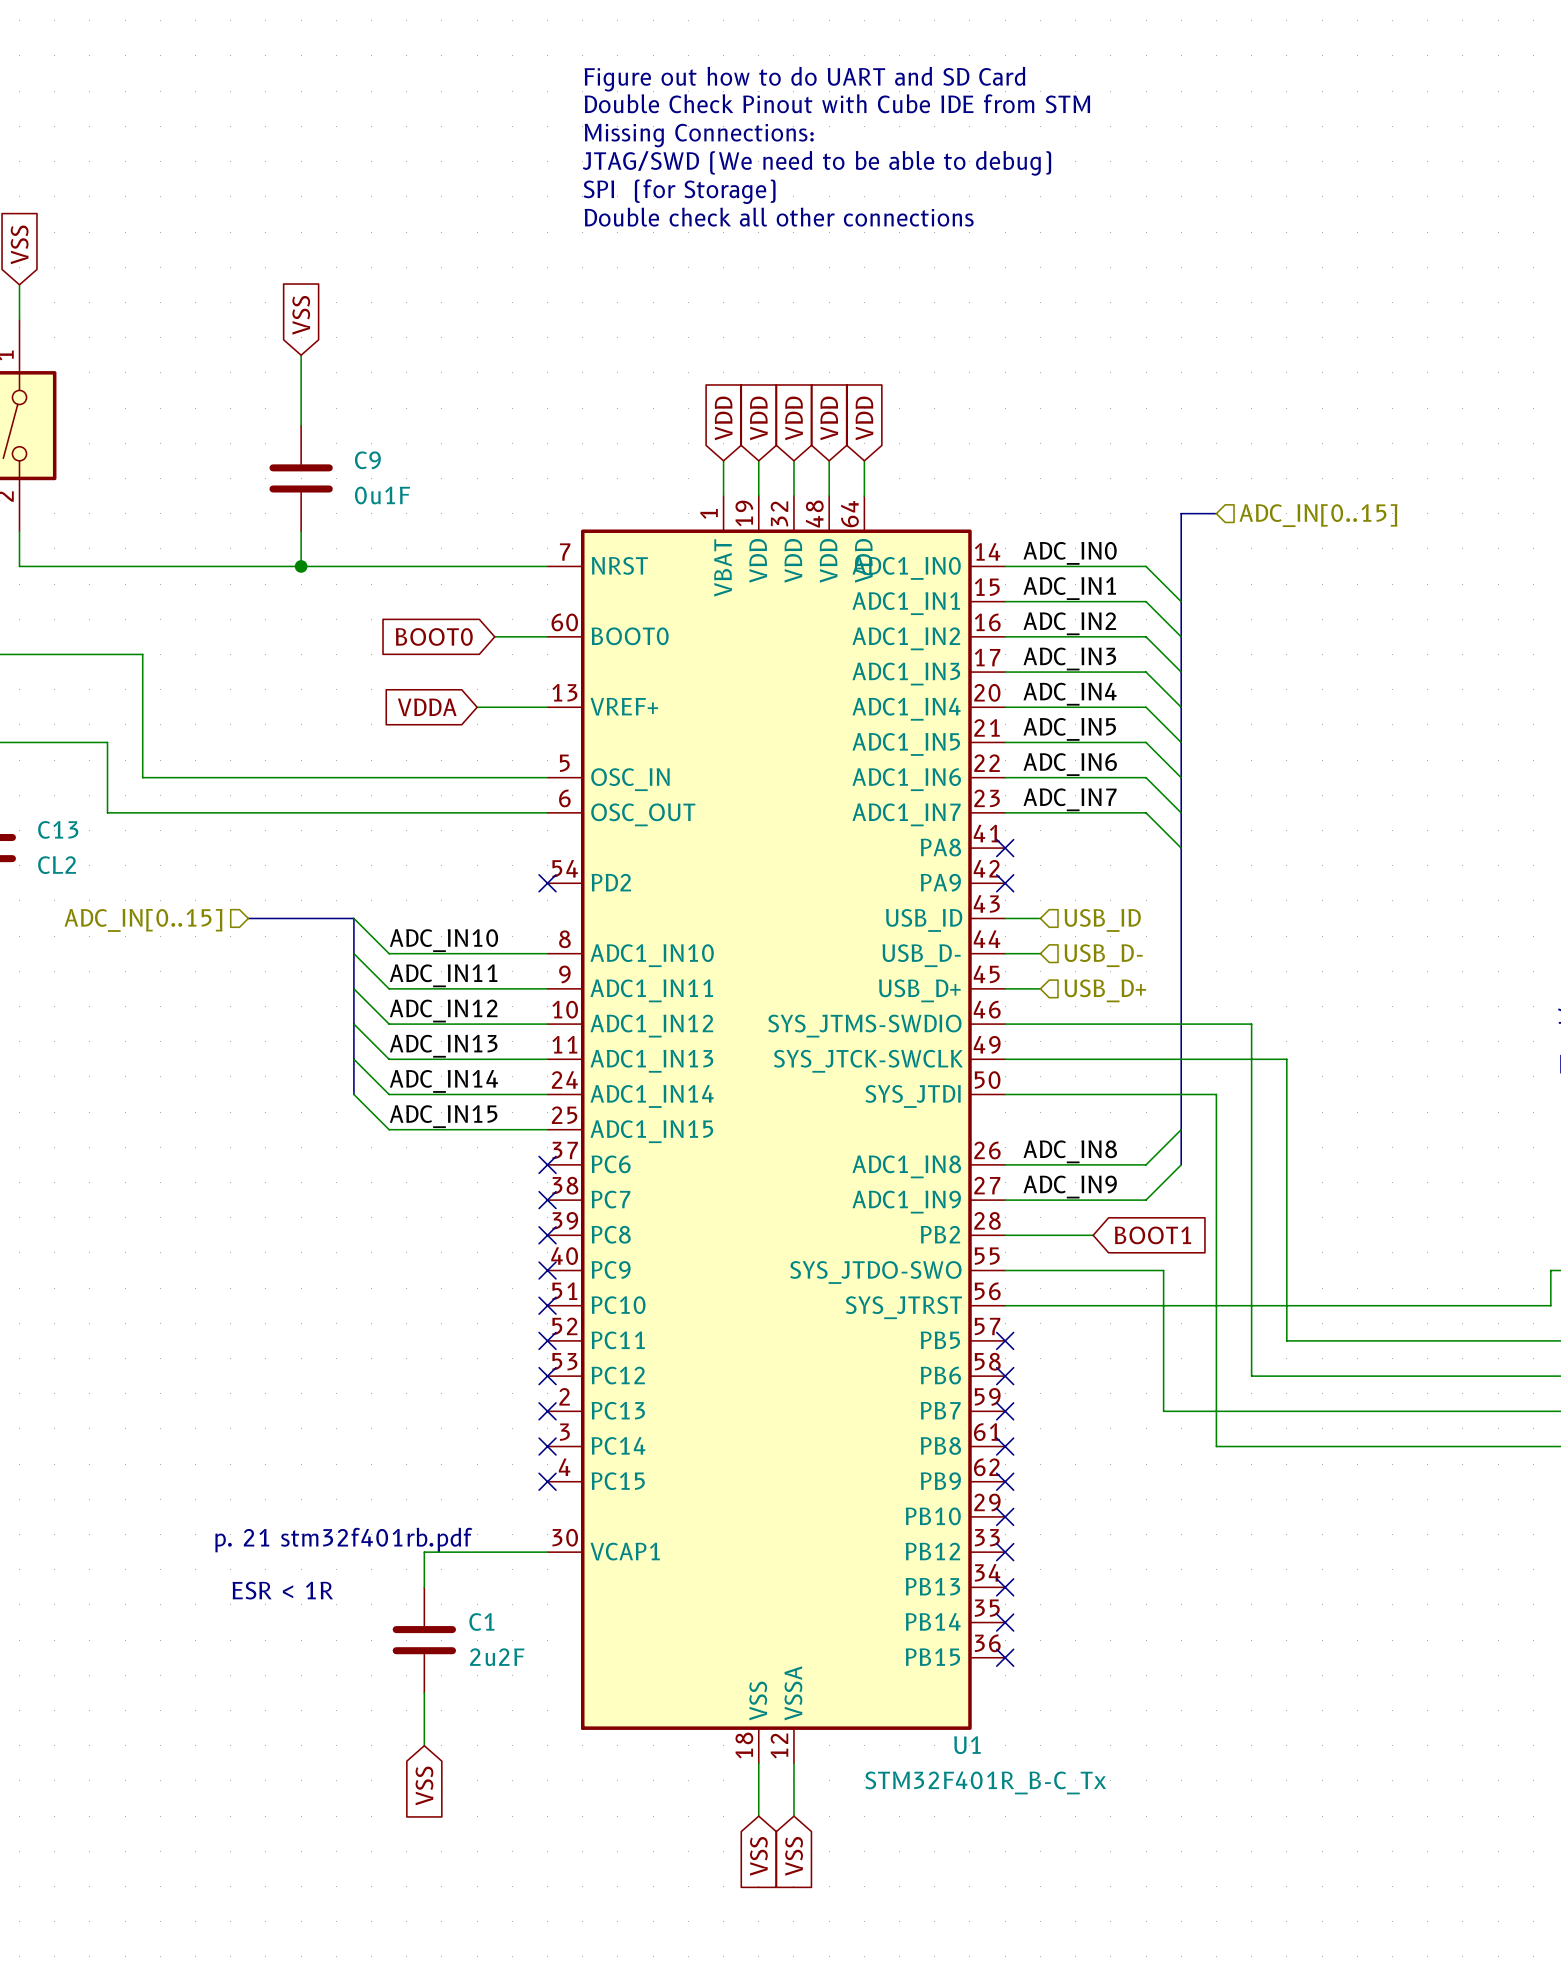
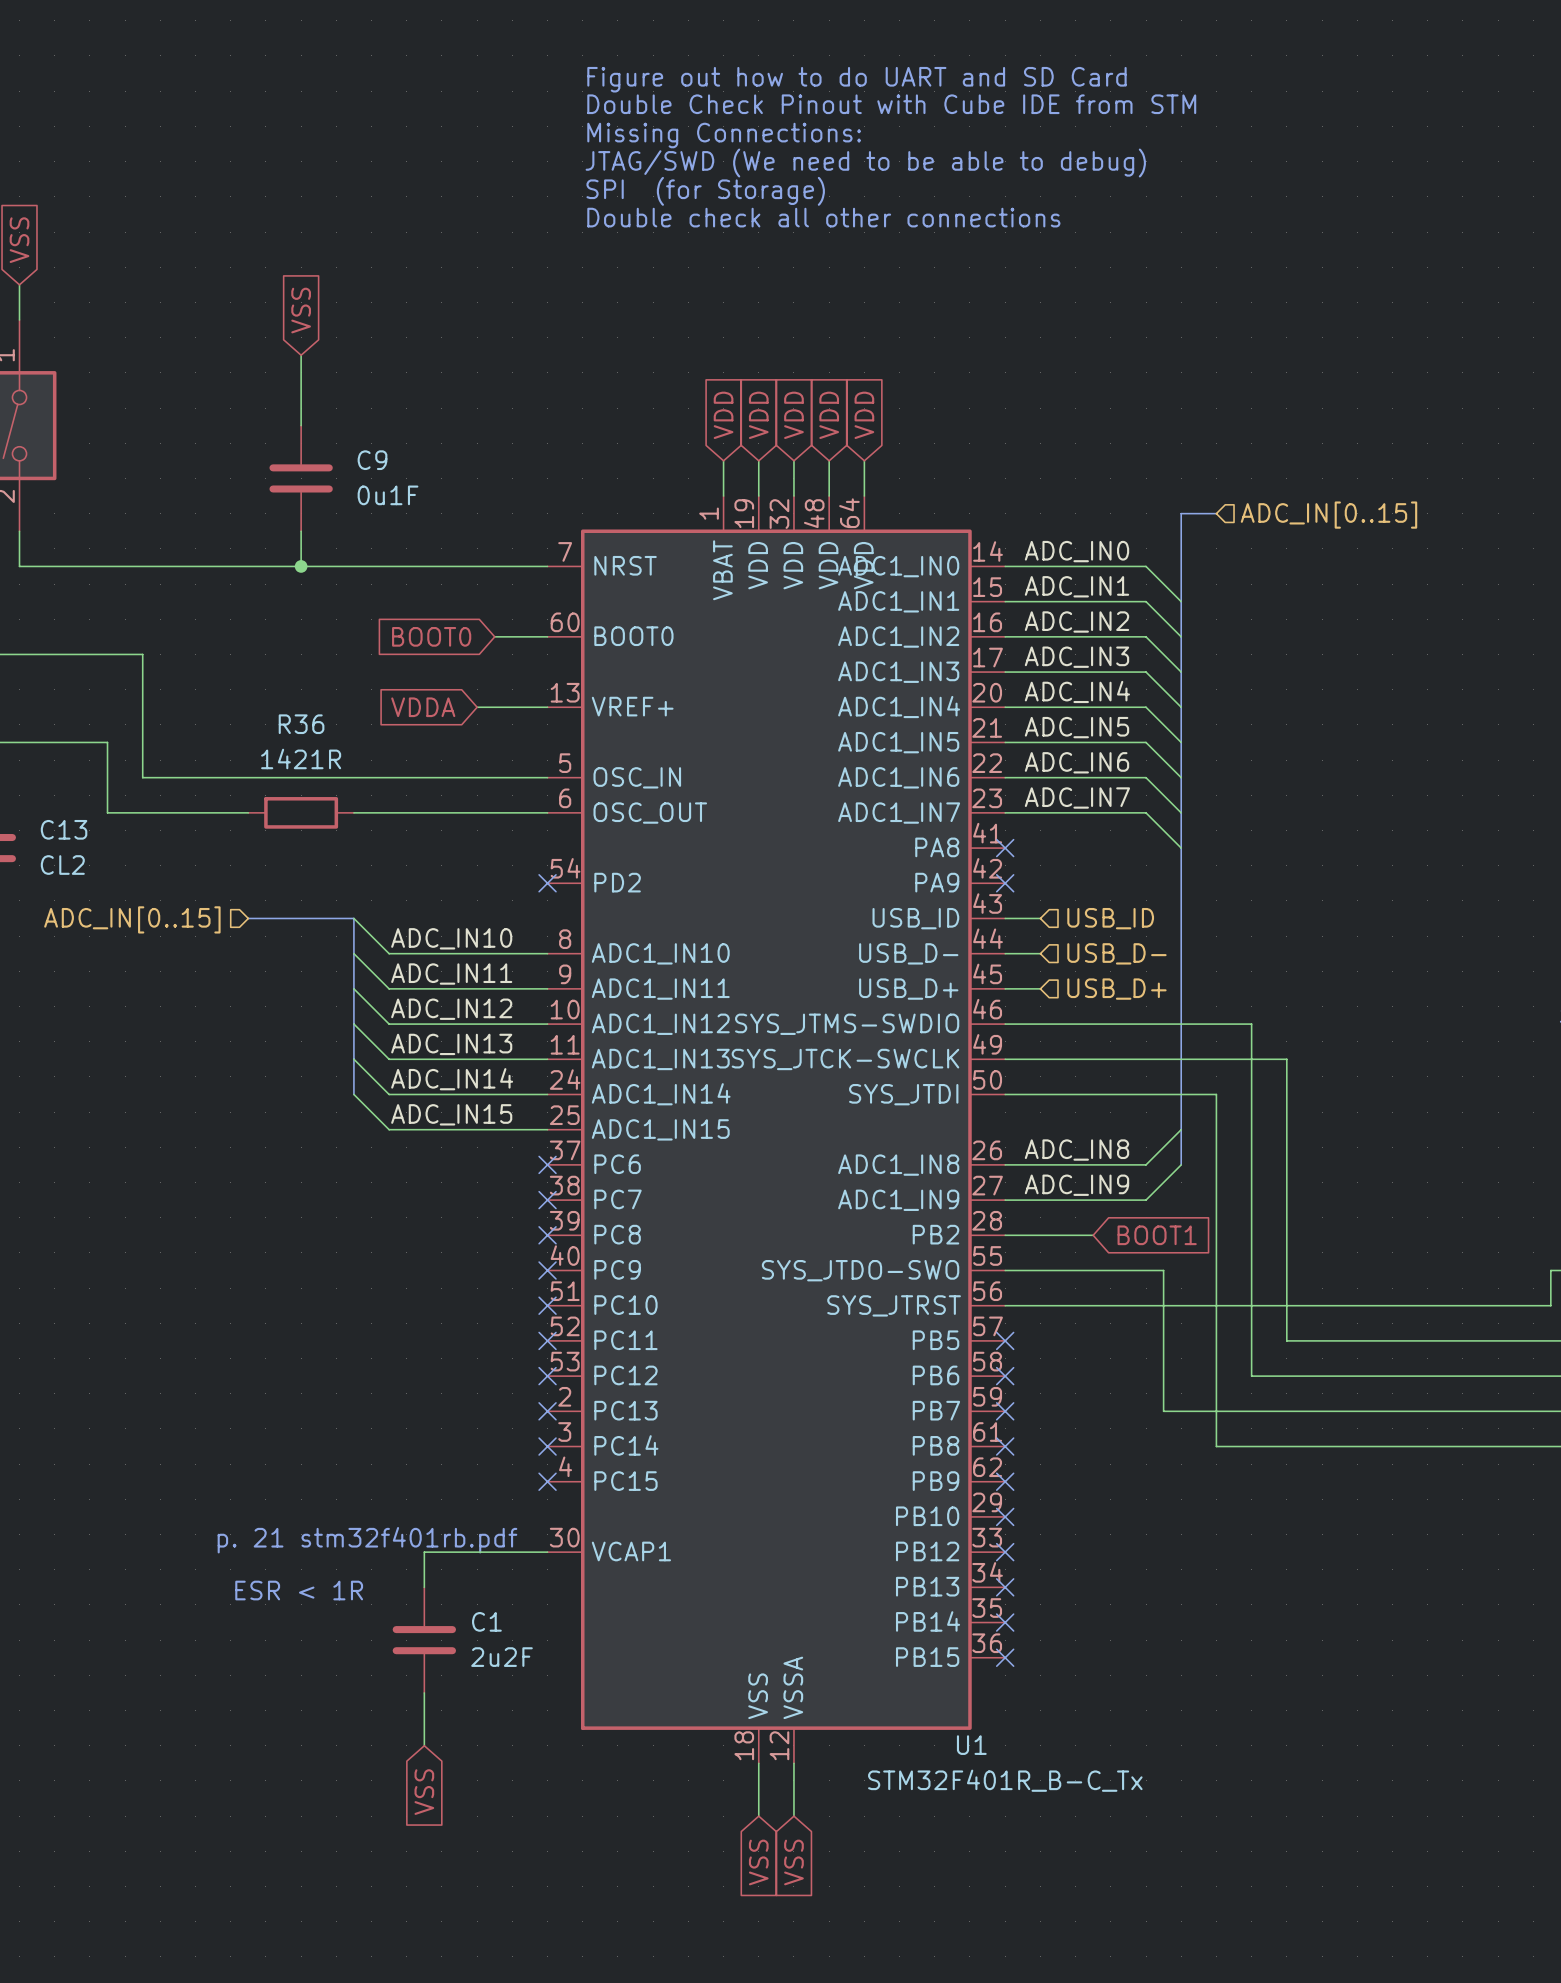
wire: (248, 812) (353, 812) -> none
R36: none -> 1421R (301, 812)

